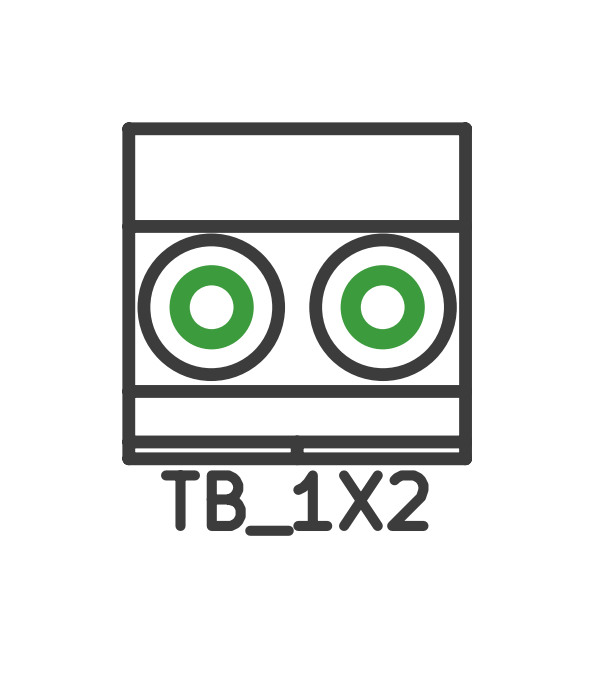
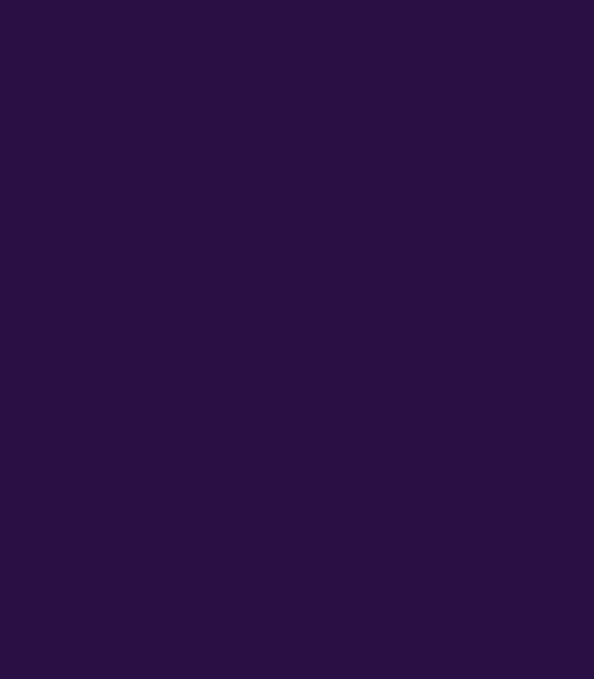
part: TB_1X2 (297, 293) -> none

